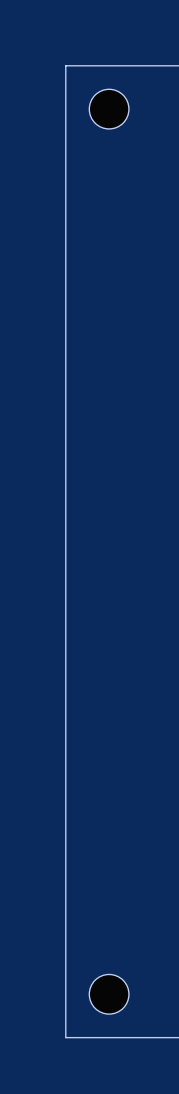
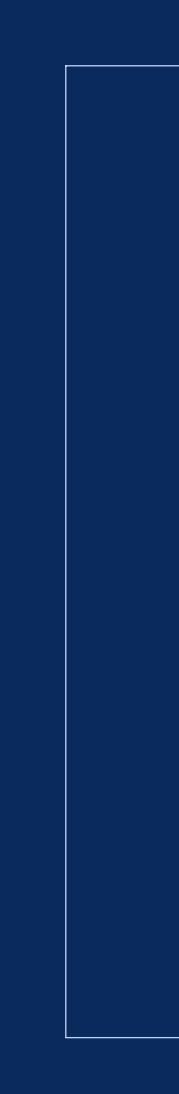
part: (109, 109) -> none
part: (109, 994) -> none

